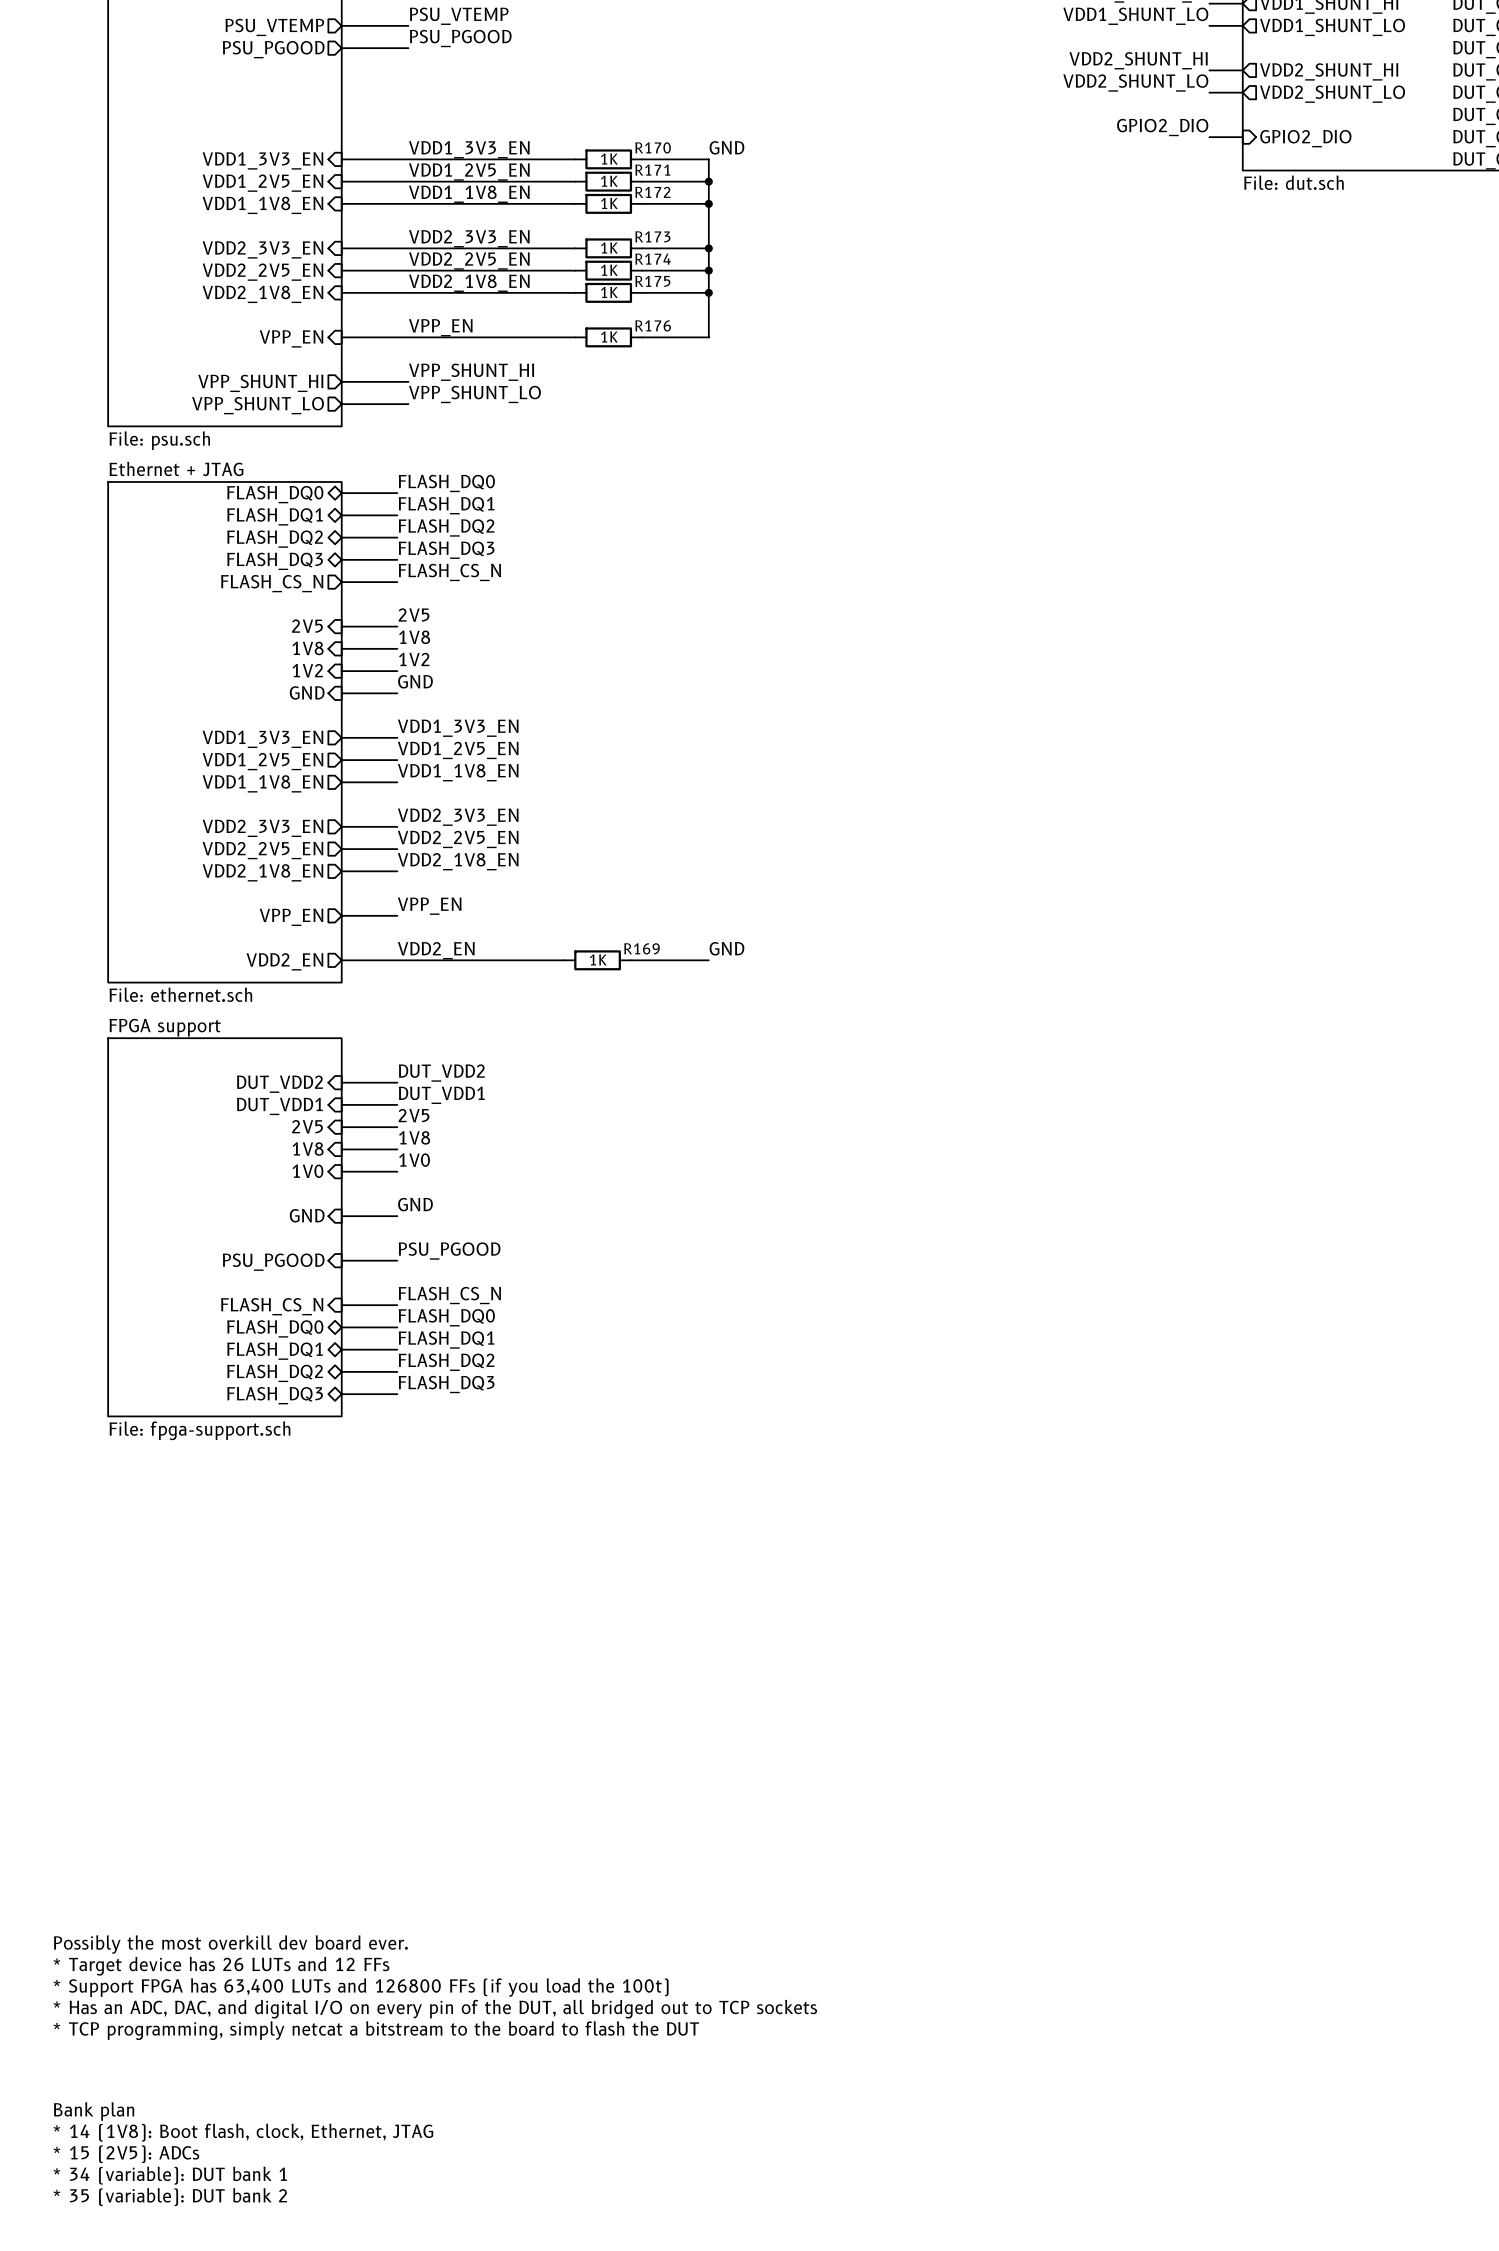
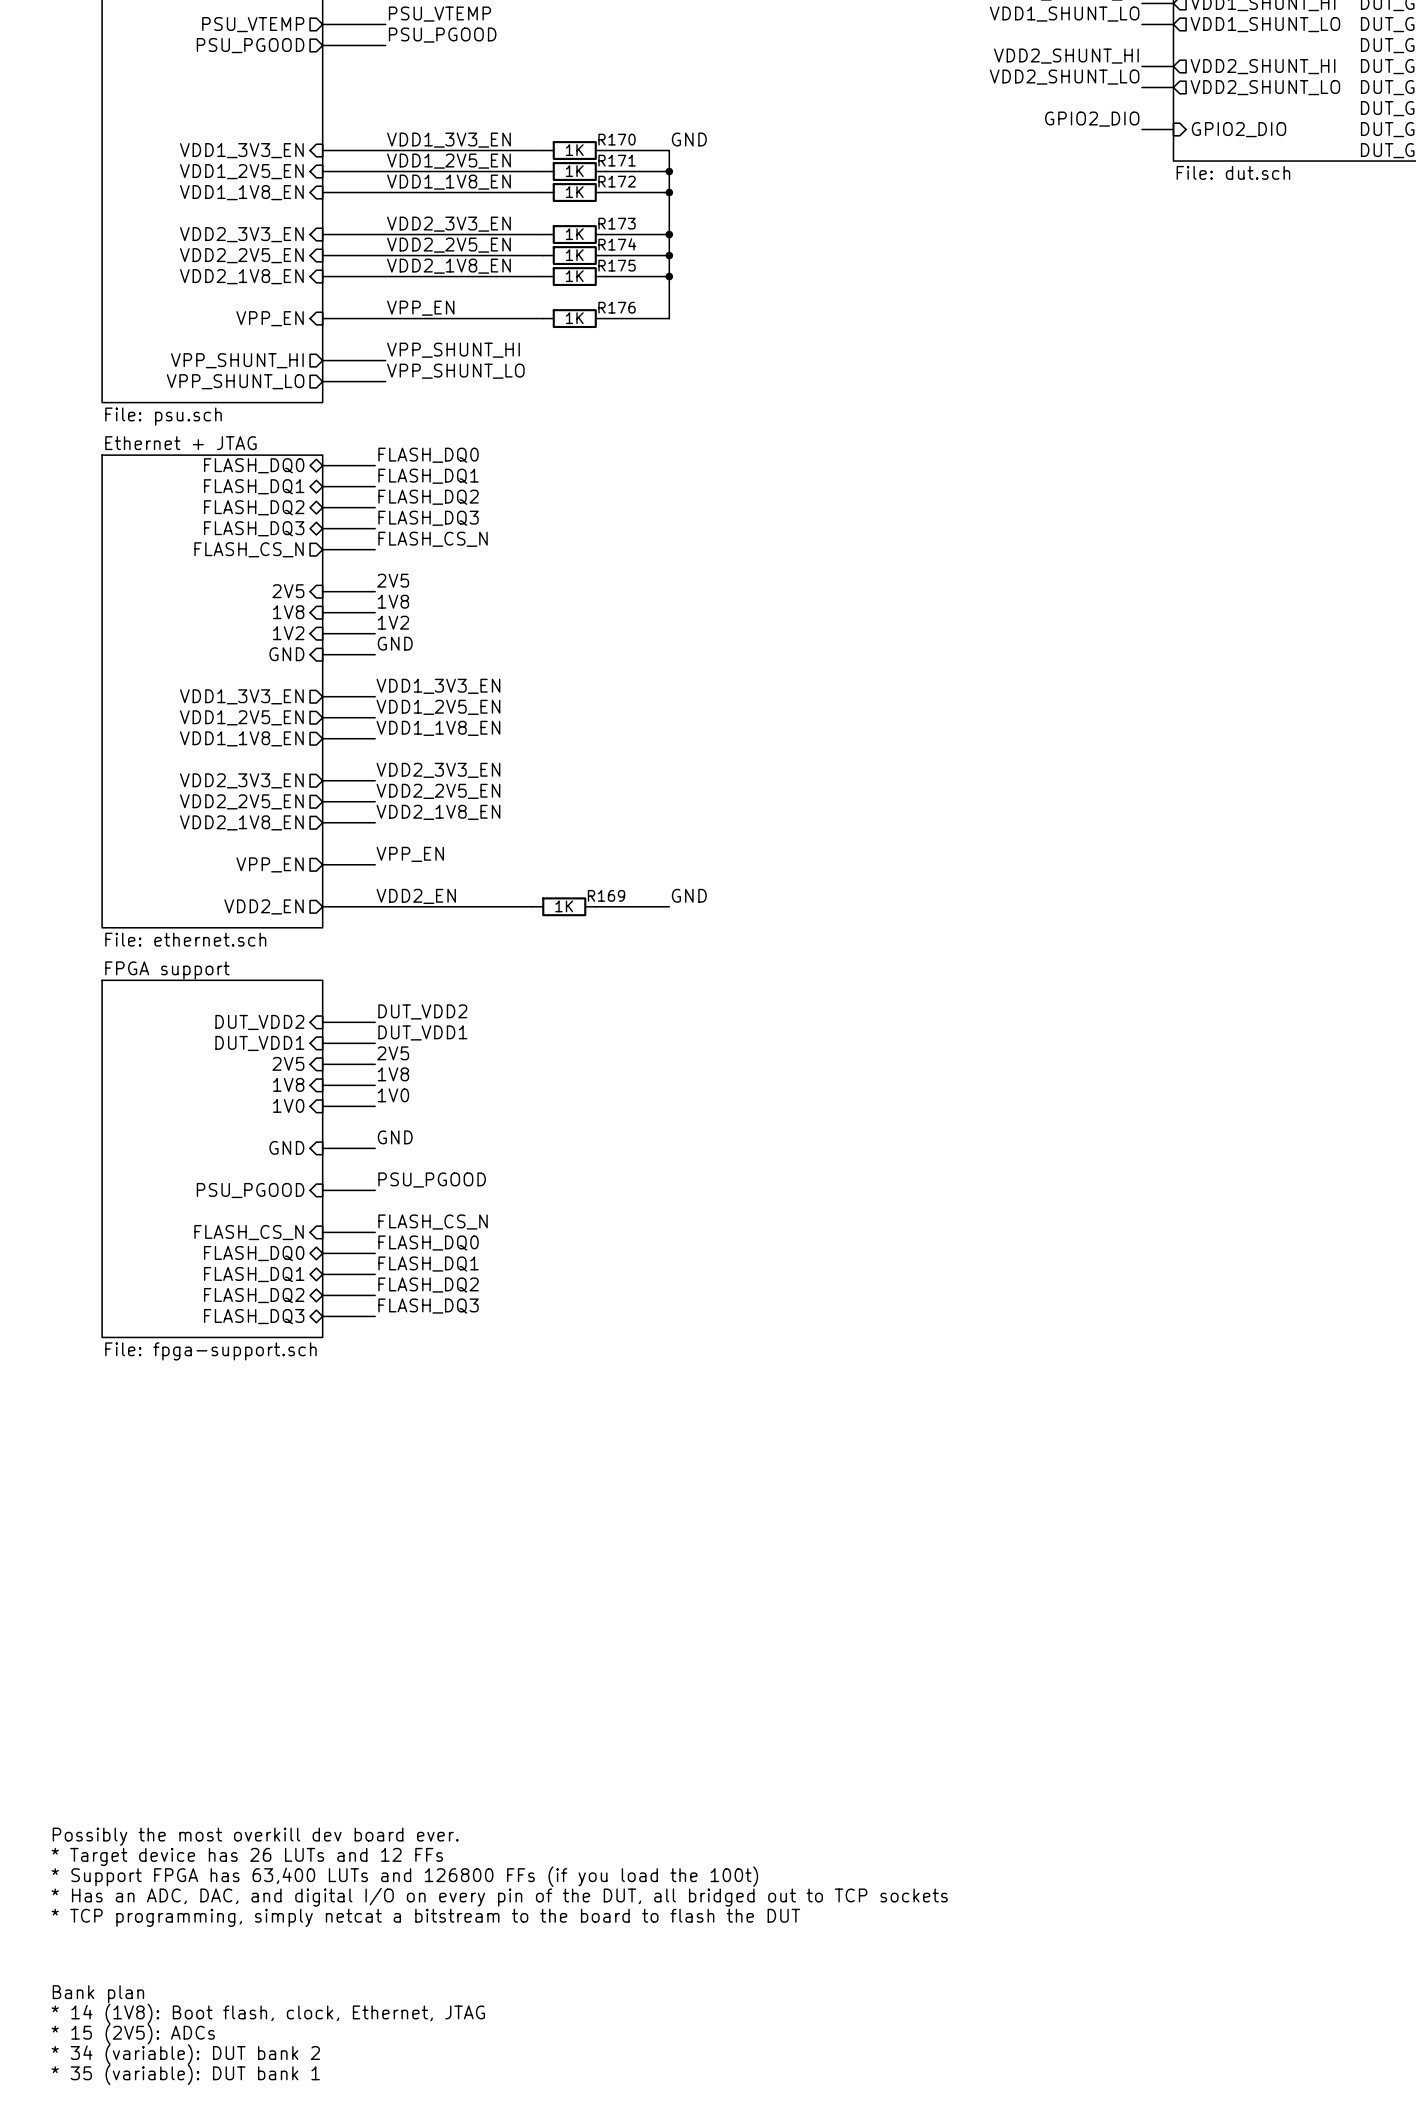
text: * 34 (variable): DUT bank 1 (170, 2175) -> * 34 (variable): DUT bank 2 (185, 2054)
text: * 35 (variable): DUT bank 2 (170, 2197) -> * 35 (variable): DUT bank 1 (185, 2074)

